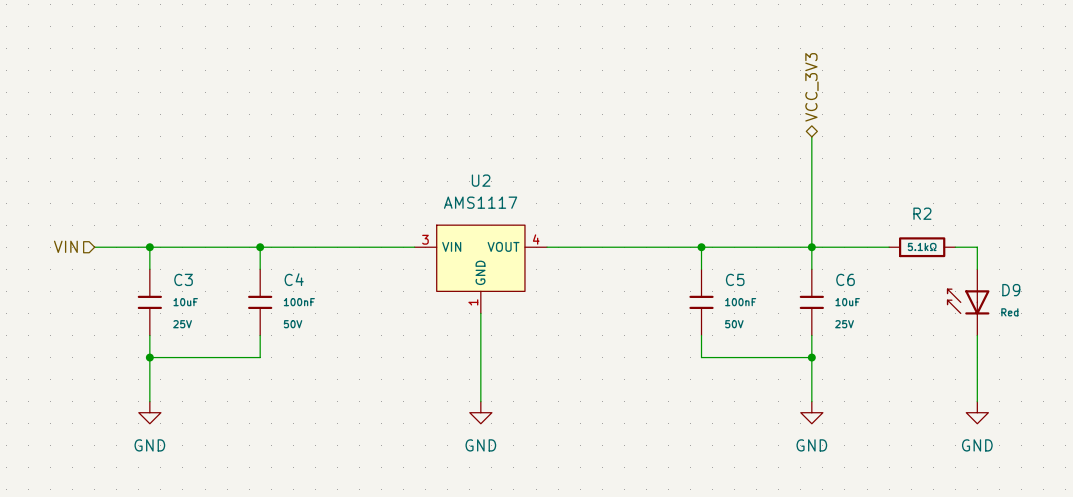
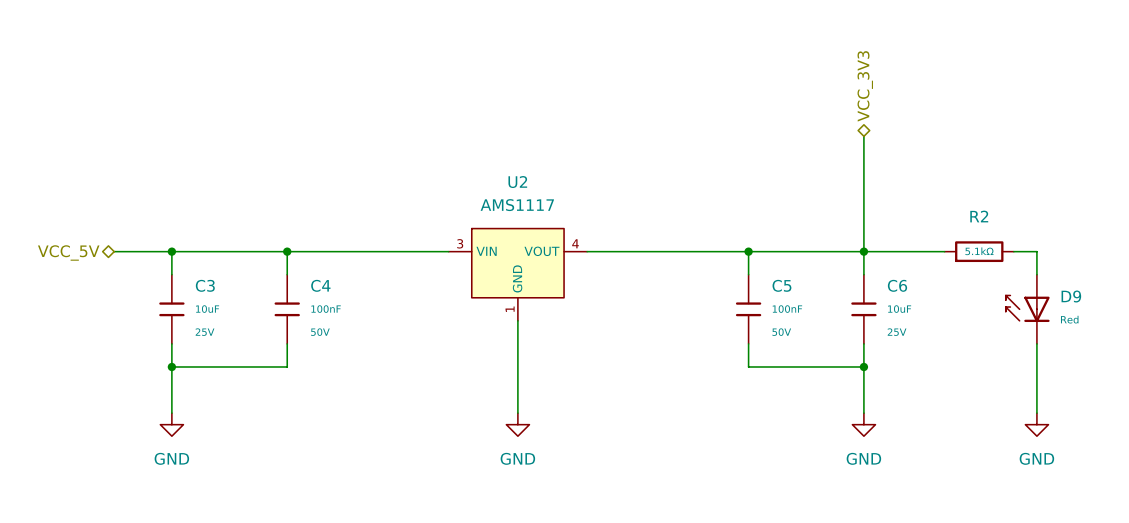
hierarchical label shape: input (65, 246) -> bidirectional (68, 252)
hierarchical label: VIN (65, 246) -> VCC_5V (68, 252)

